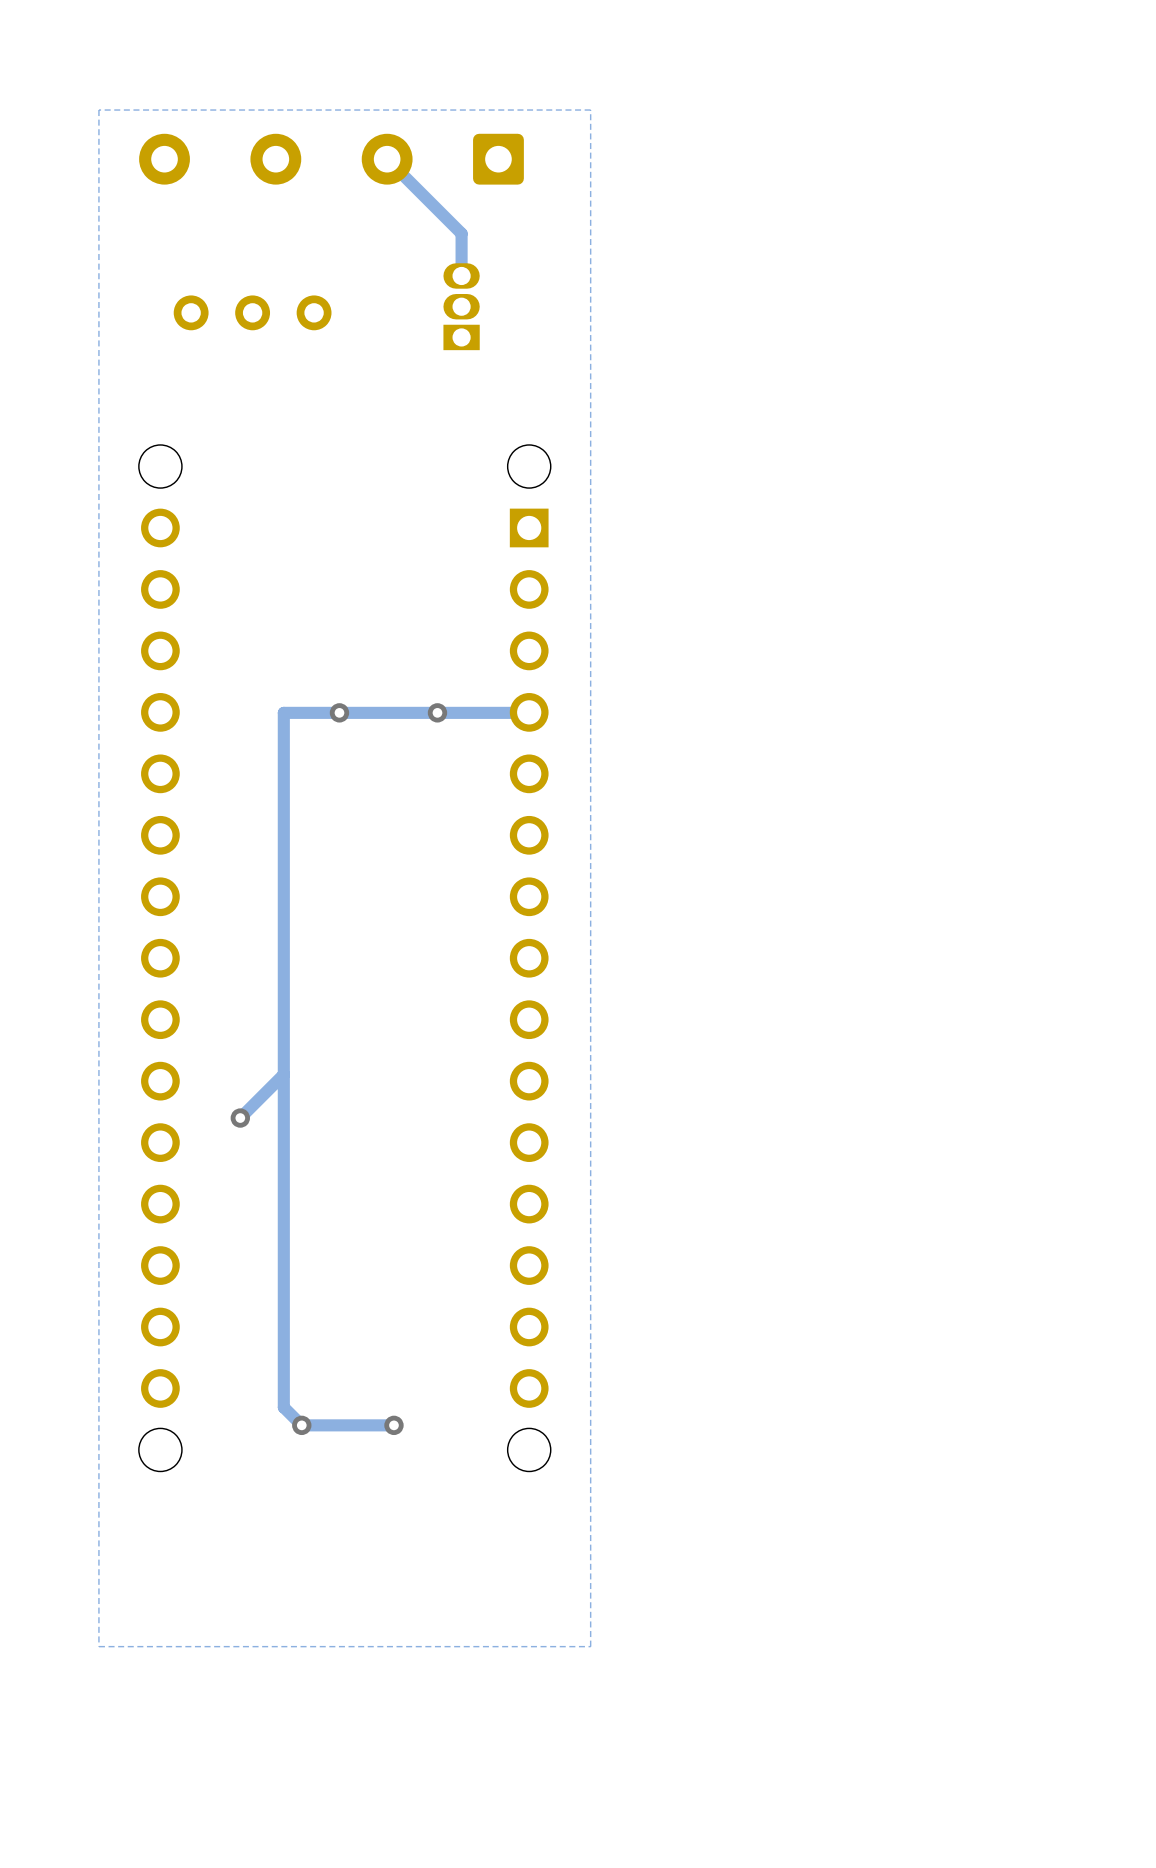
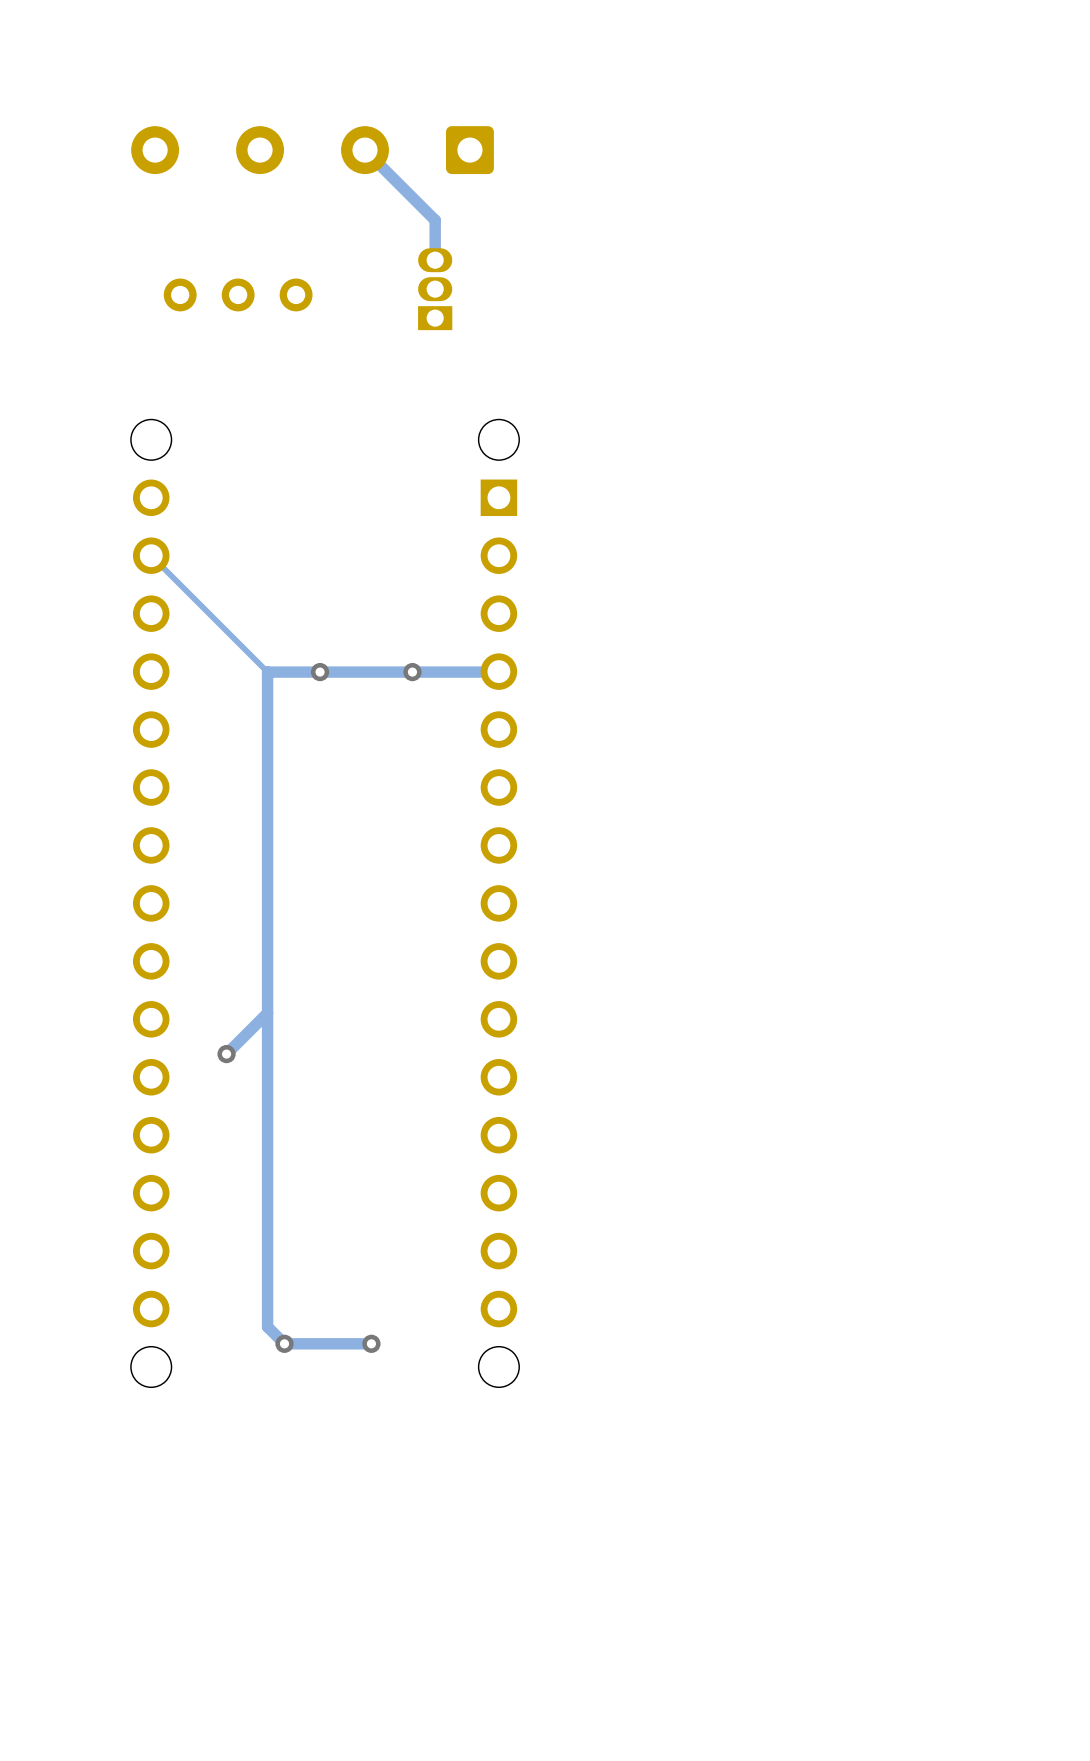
zone outline: (590, 110) (590, 1646) (98, 1646) (98, 110) (590, 110) -> none
track: none -> (151, 555) (267, 672)

